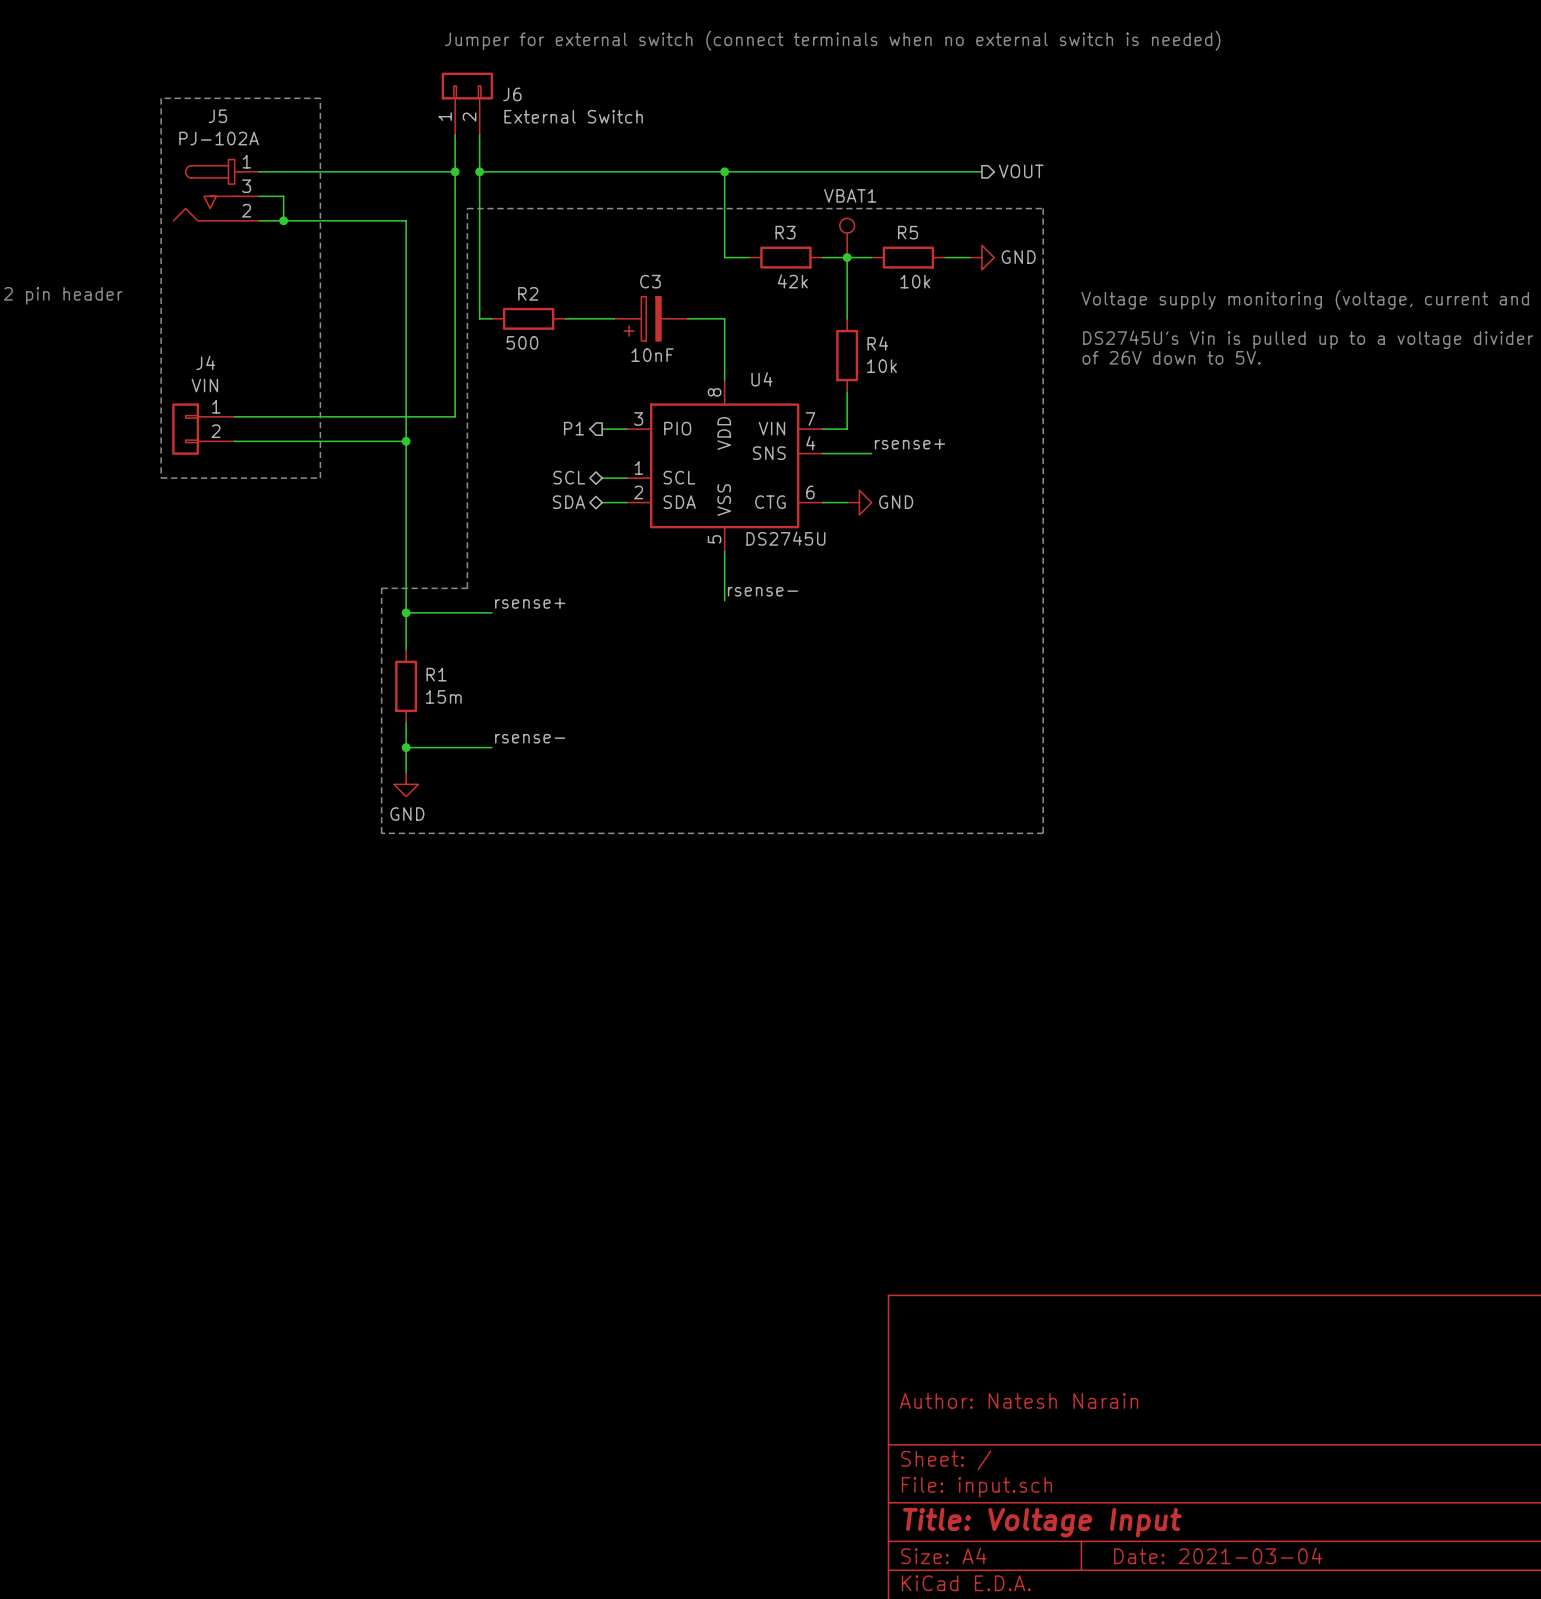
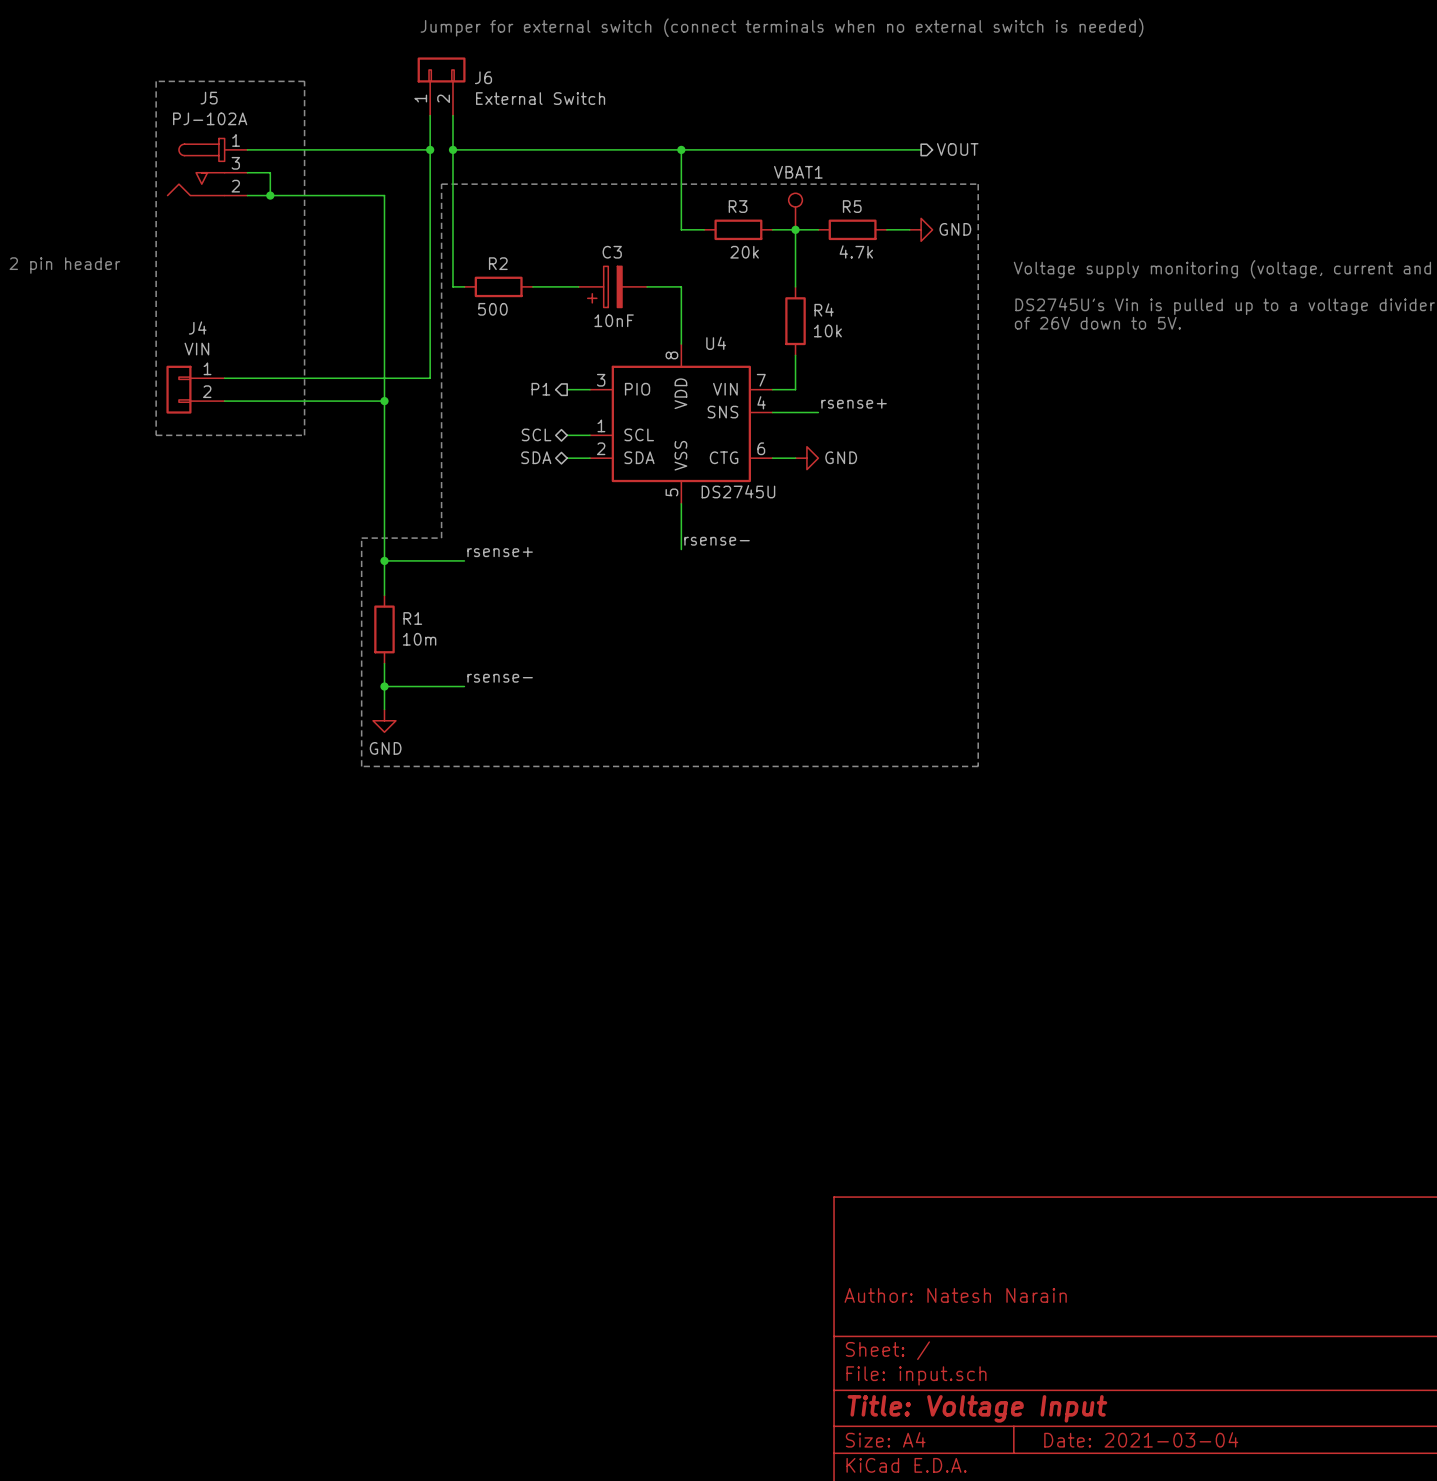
R3 value: 42k (792, 281) -> 20k (744, 252)
R5 value: 10k (915, 281) -> 4.7k (856, 251)
R1 value: 15m (443, 696) -> 10m (419, 639)

